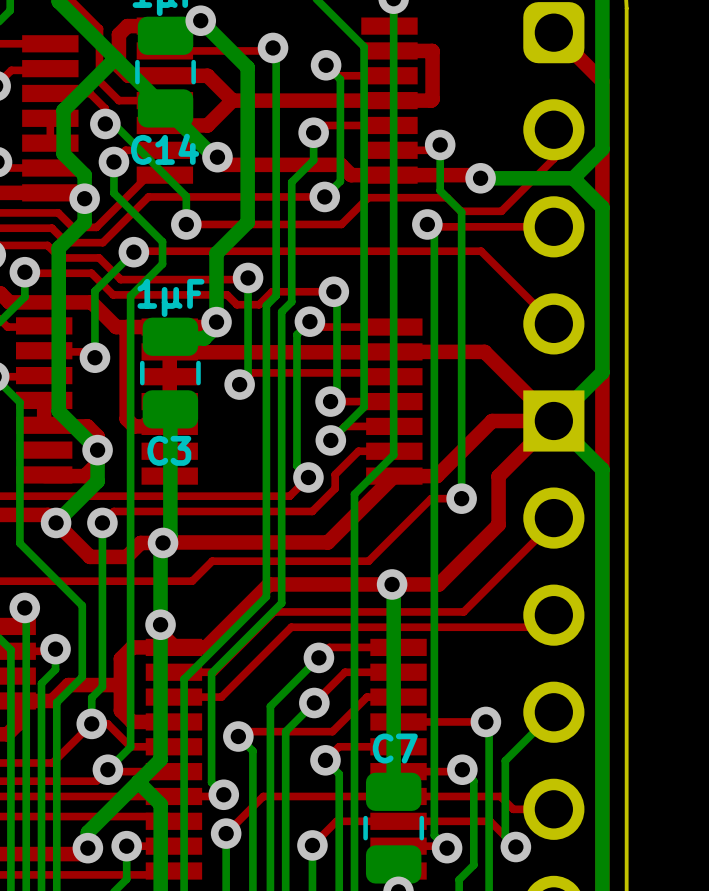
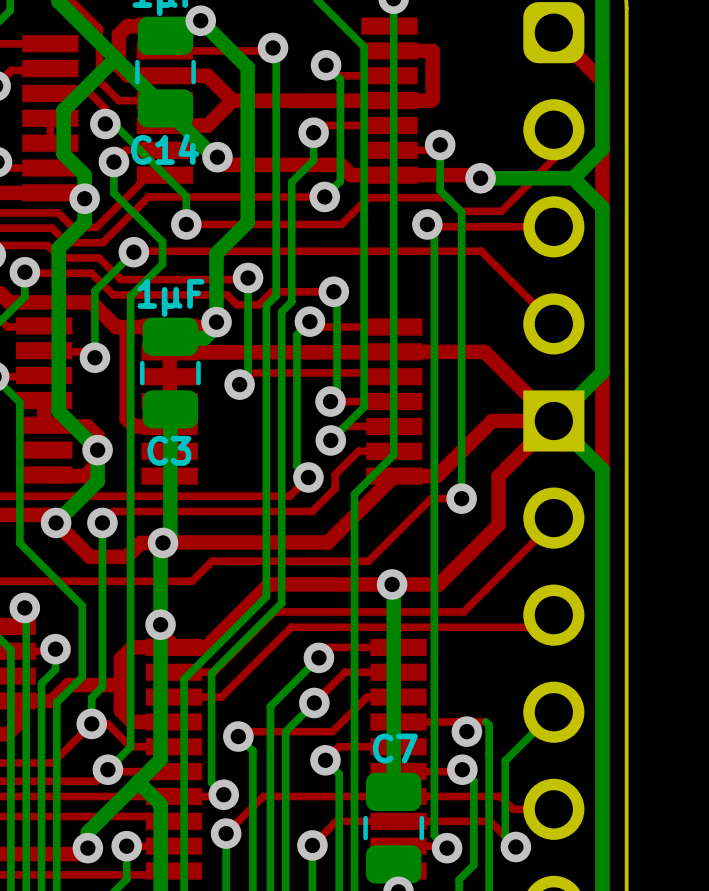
via position: (485, 721) -> (466, 731)

